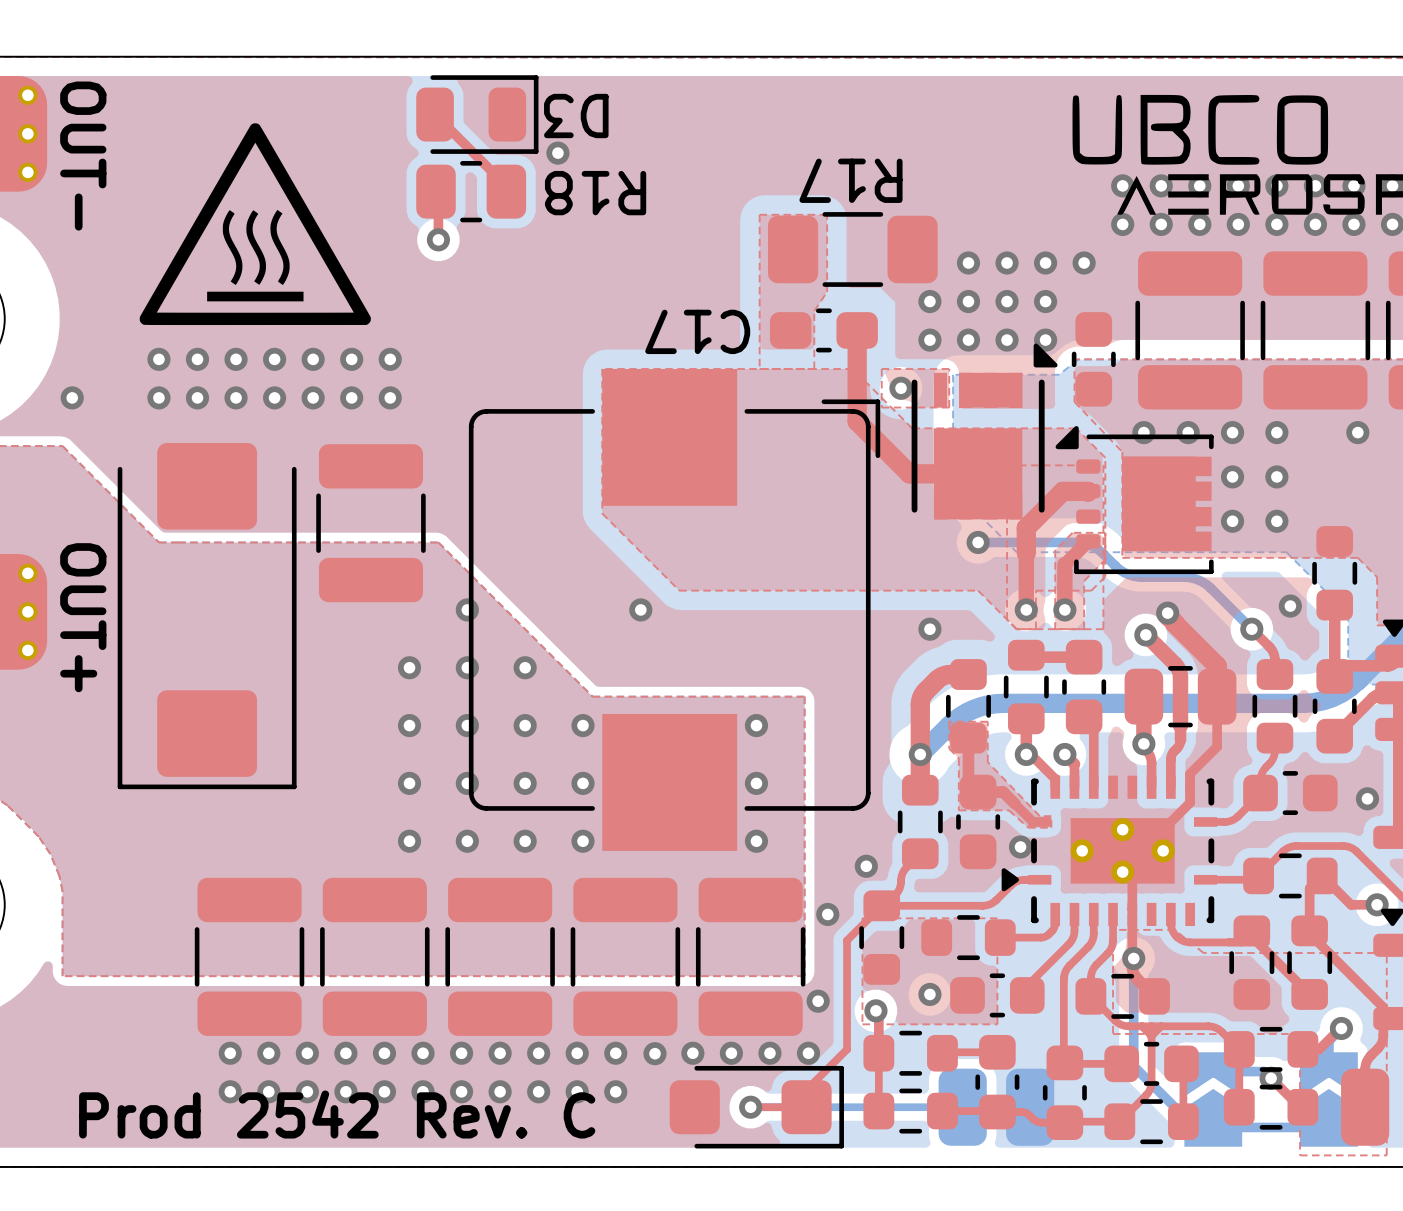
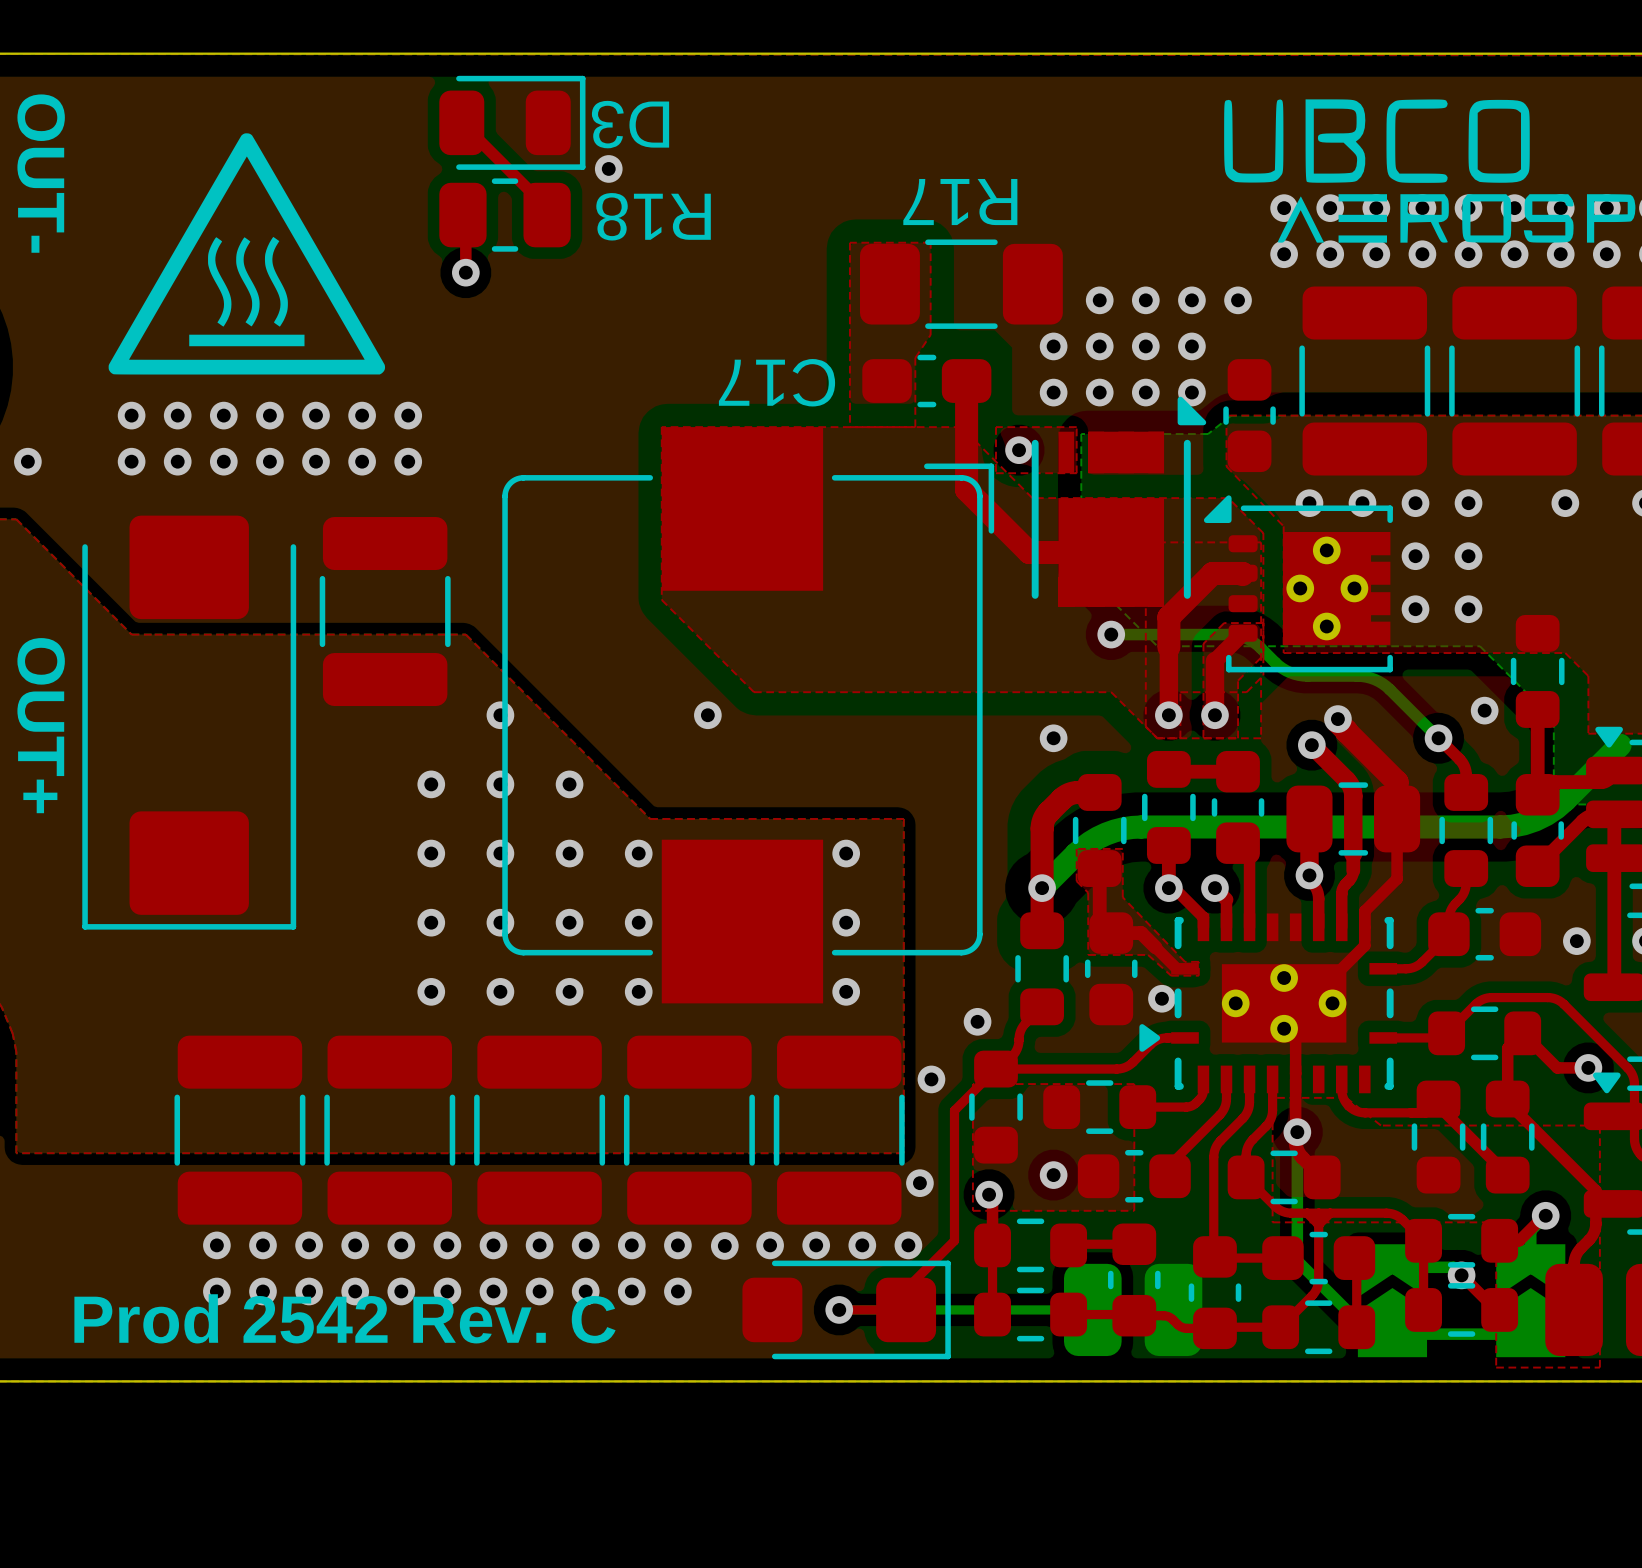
part footprint: [1055, 426, 1214, 575] -> [1203, 495, 1393, 673]

